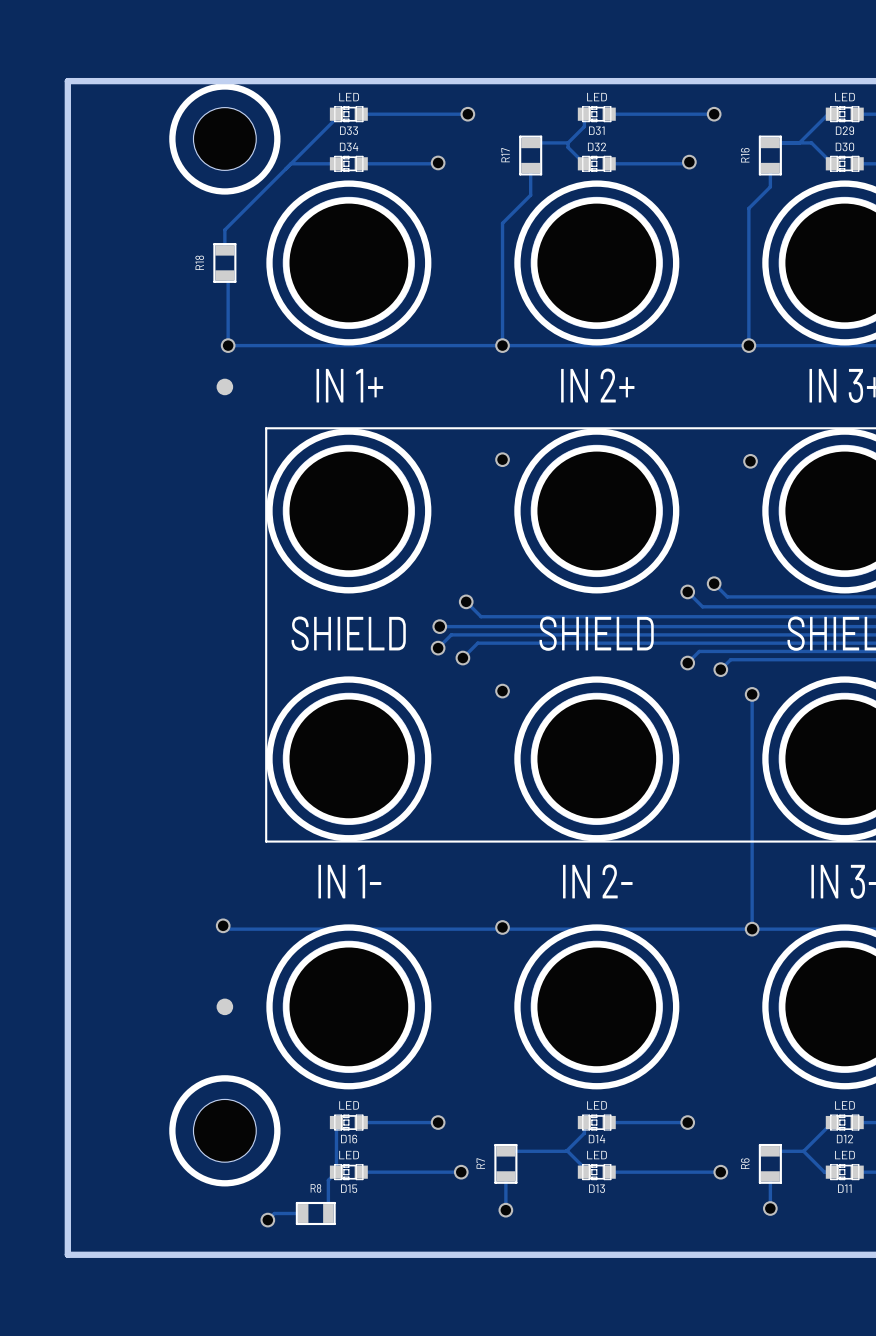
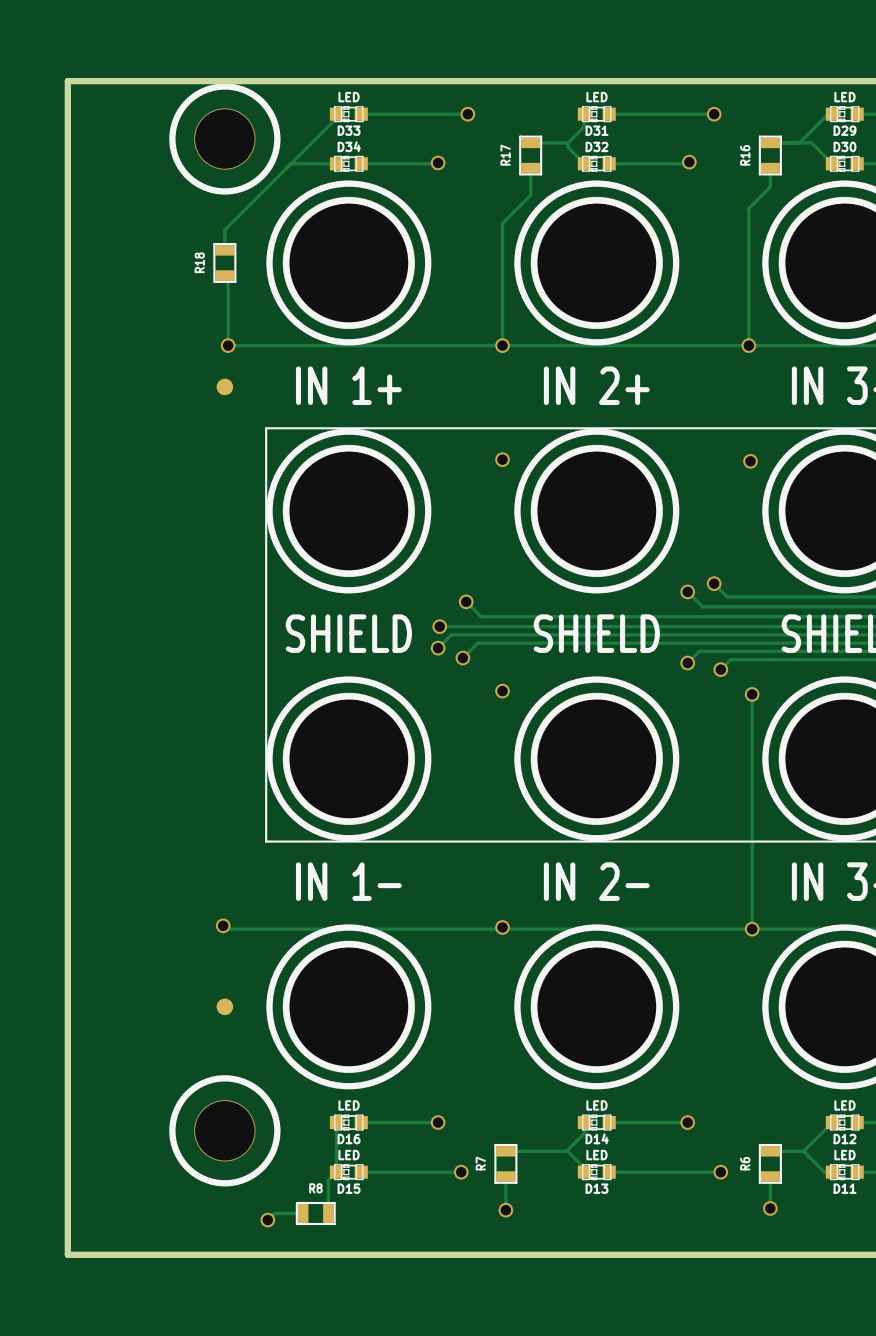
part footprint: [169, 83, 281, 195] -> [169, 83, 281, 195]
part footprint: [169, 1075, 281, 1187] -> [169, 1075, 281, 1187]

